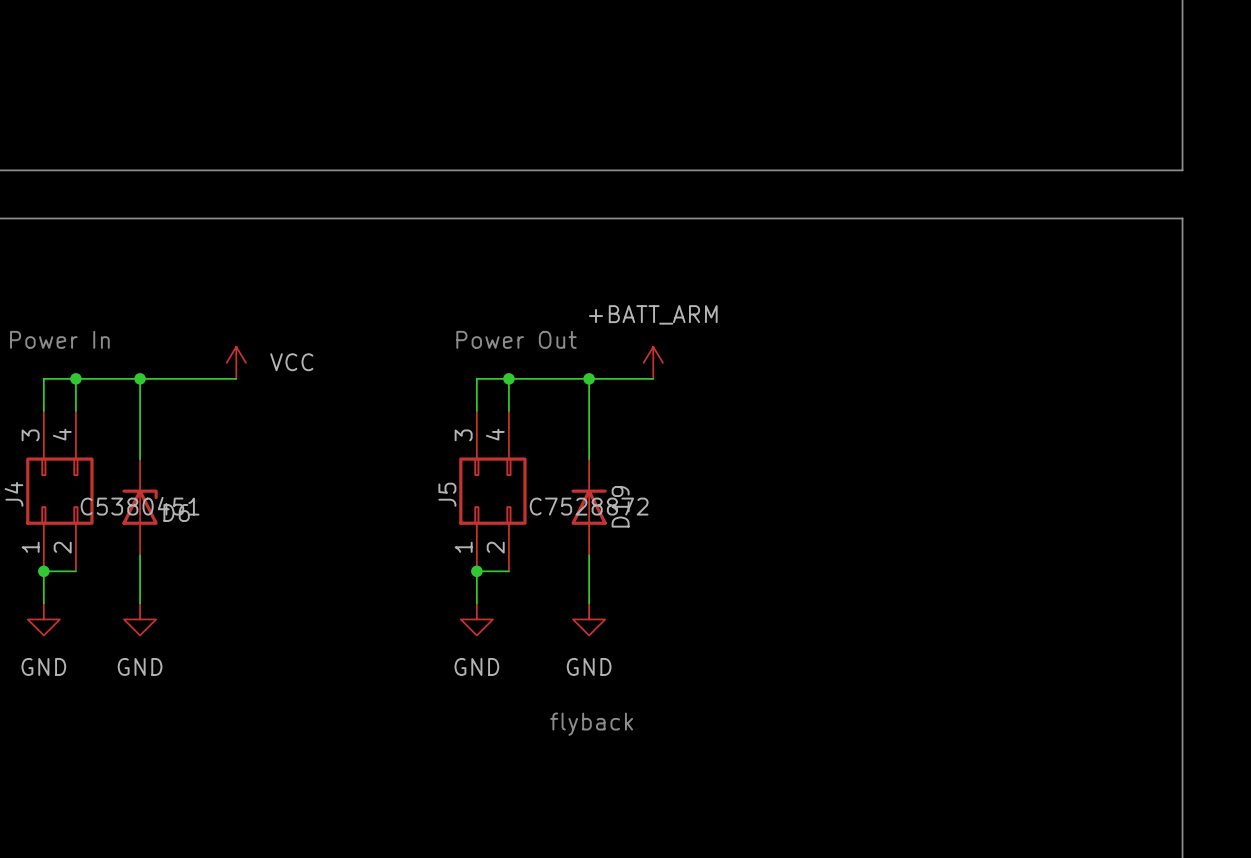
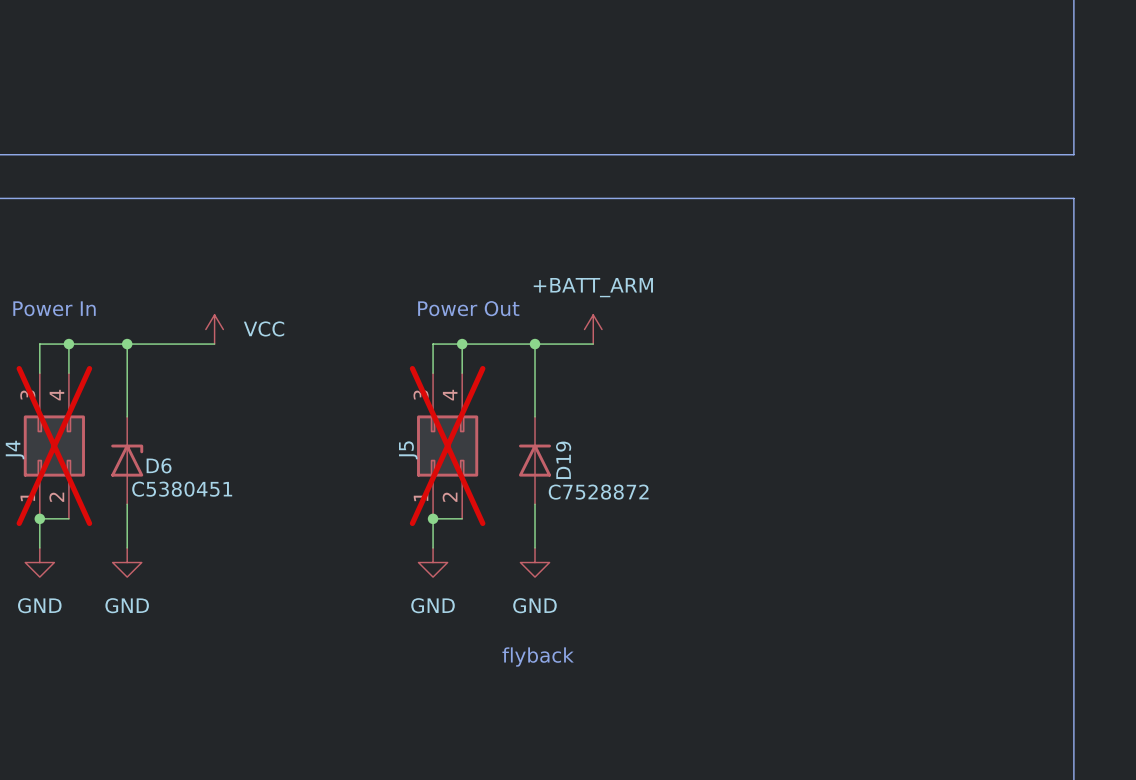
J4 do-not-place cross: none -> (54, 446)
J5 do-not-place cross: none -> (447, 446)
D6 text position: C5380451 (140, 506) -> C5380451 (182, 489)
D19 text position: C7528872 (589, 506) -> C7528872 (598, 492)

